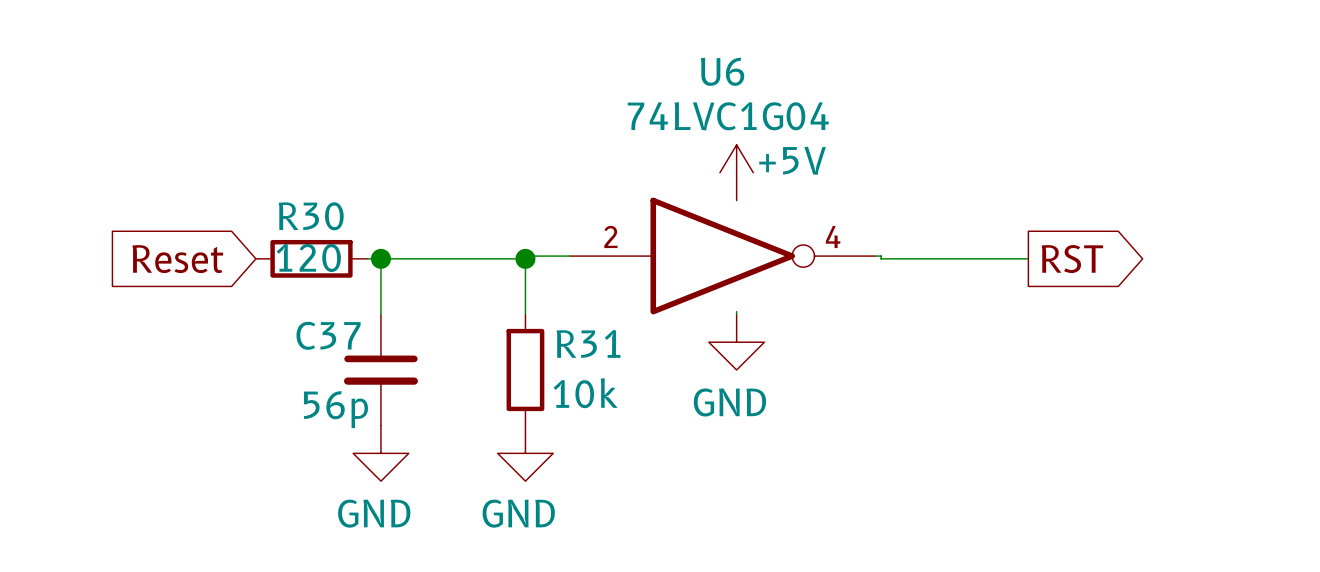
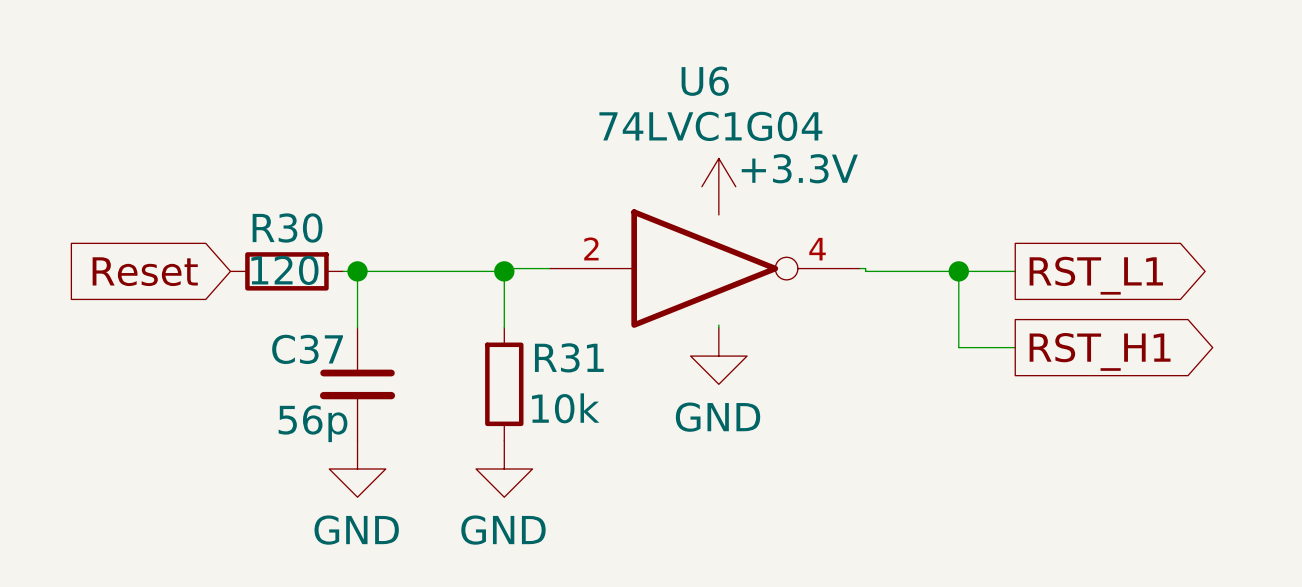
power symbol: +5V (736, 172) -> +3.3V (718, 186)
wire: none -> (958, 271) (958, 347) (1015, 347)
junction: none -> (958, 271)
global label: RST (1072, 259) -> RST_L1 (1096, 275)
global label: none -> RST_H1 (1100, 351)

